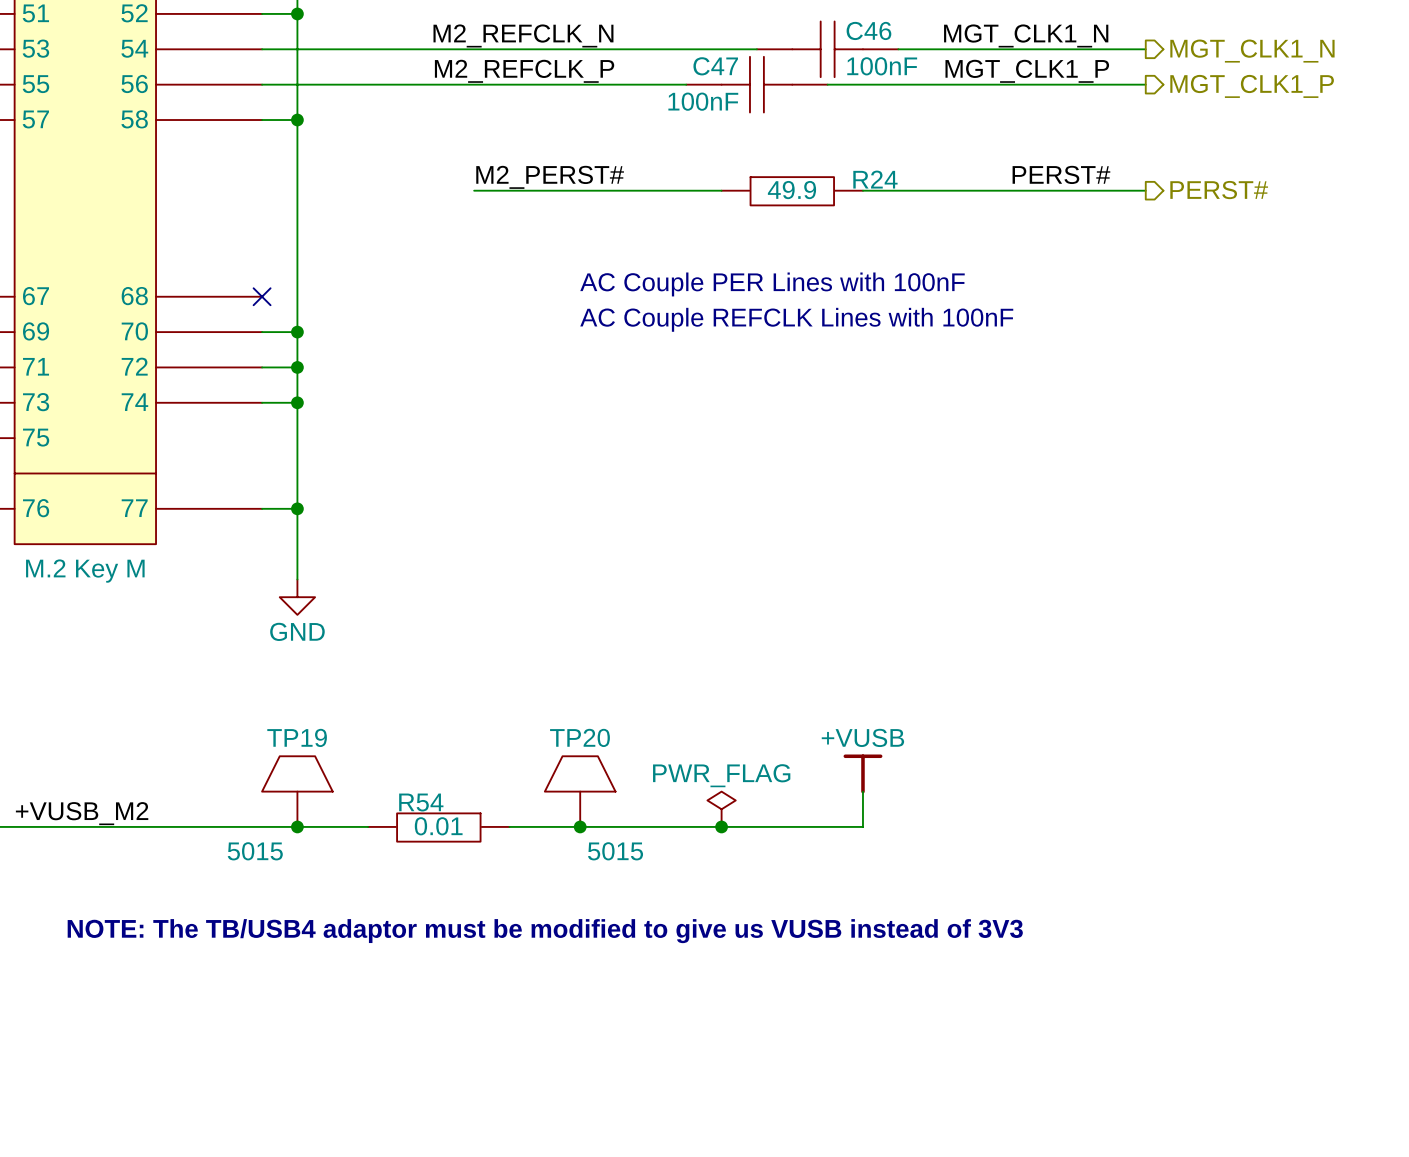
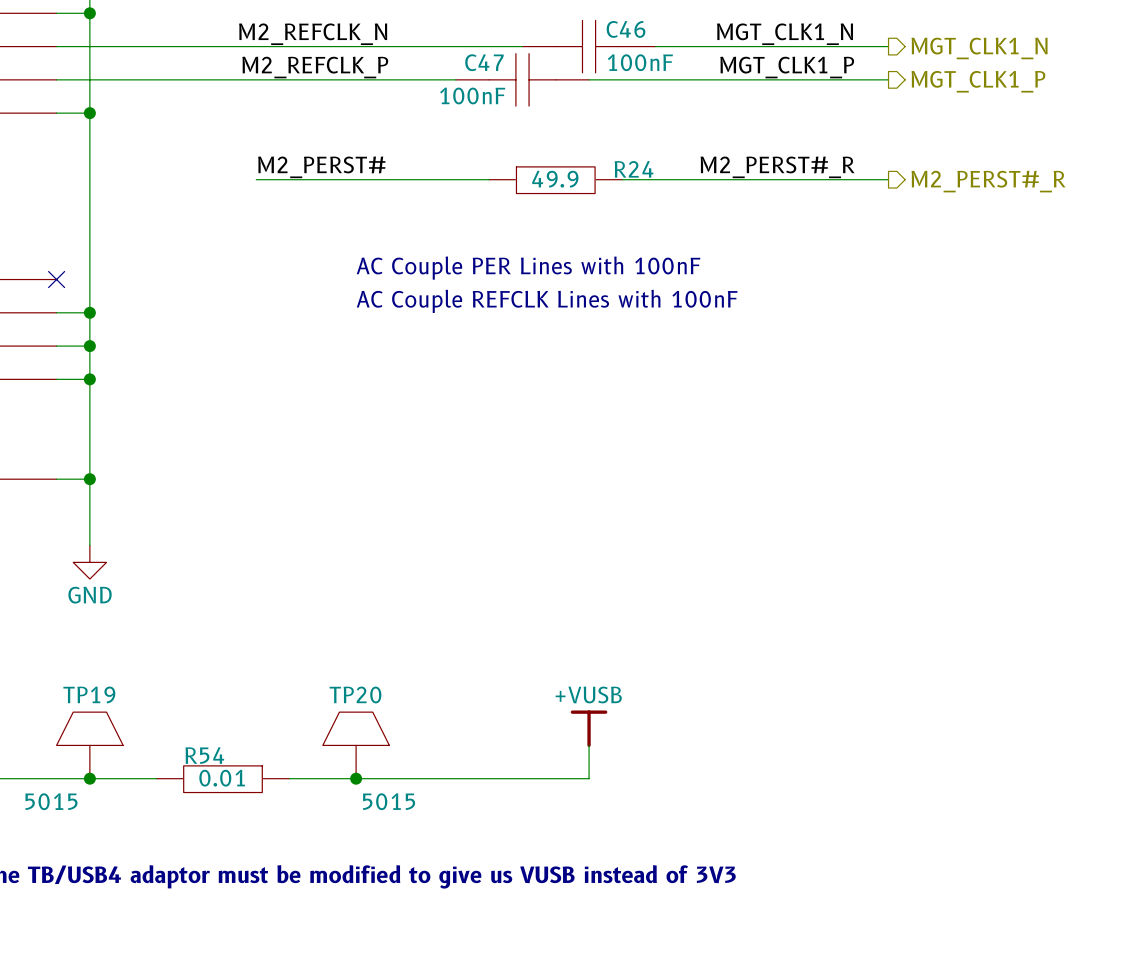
label: PERST# (1061, 174) -> M2_PERST#_R (777, 167)
hierarchical label: PERST# (1219, 190) -> M2_PERST#_R (988, 181)
power symbol position: +VUSB (862, 773) -> +VUSB (589, 728)
wire: (862, 791) (862, 826) (827, 826) -> (589, 745) (589, 778)
power symbol: PWR_FLAG (721, 809) -> none
junction: (721, 826) -> none

